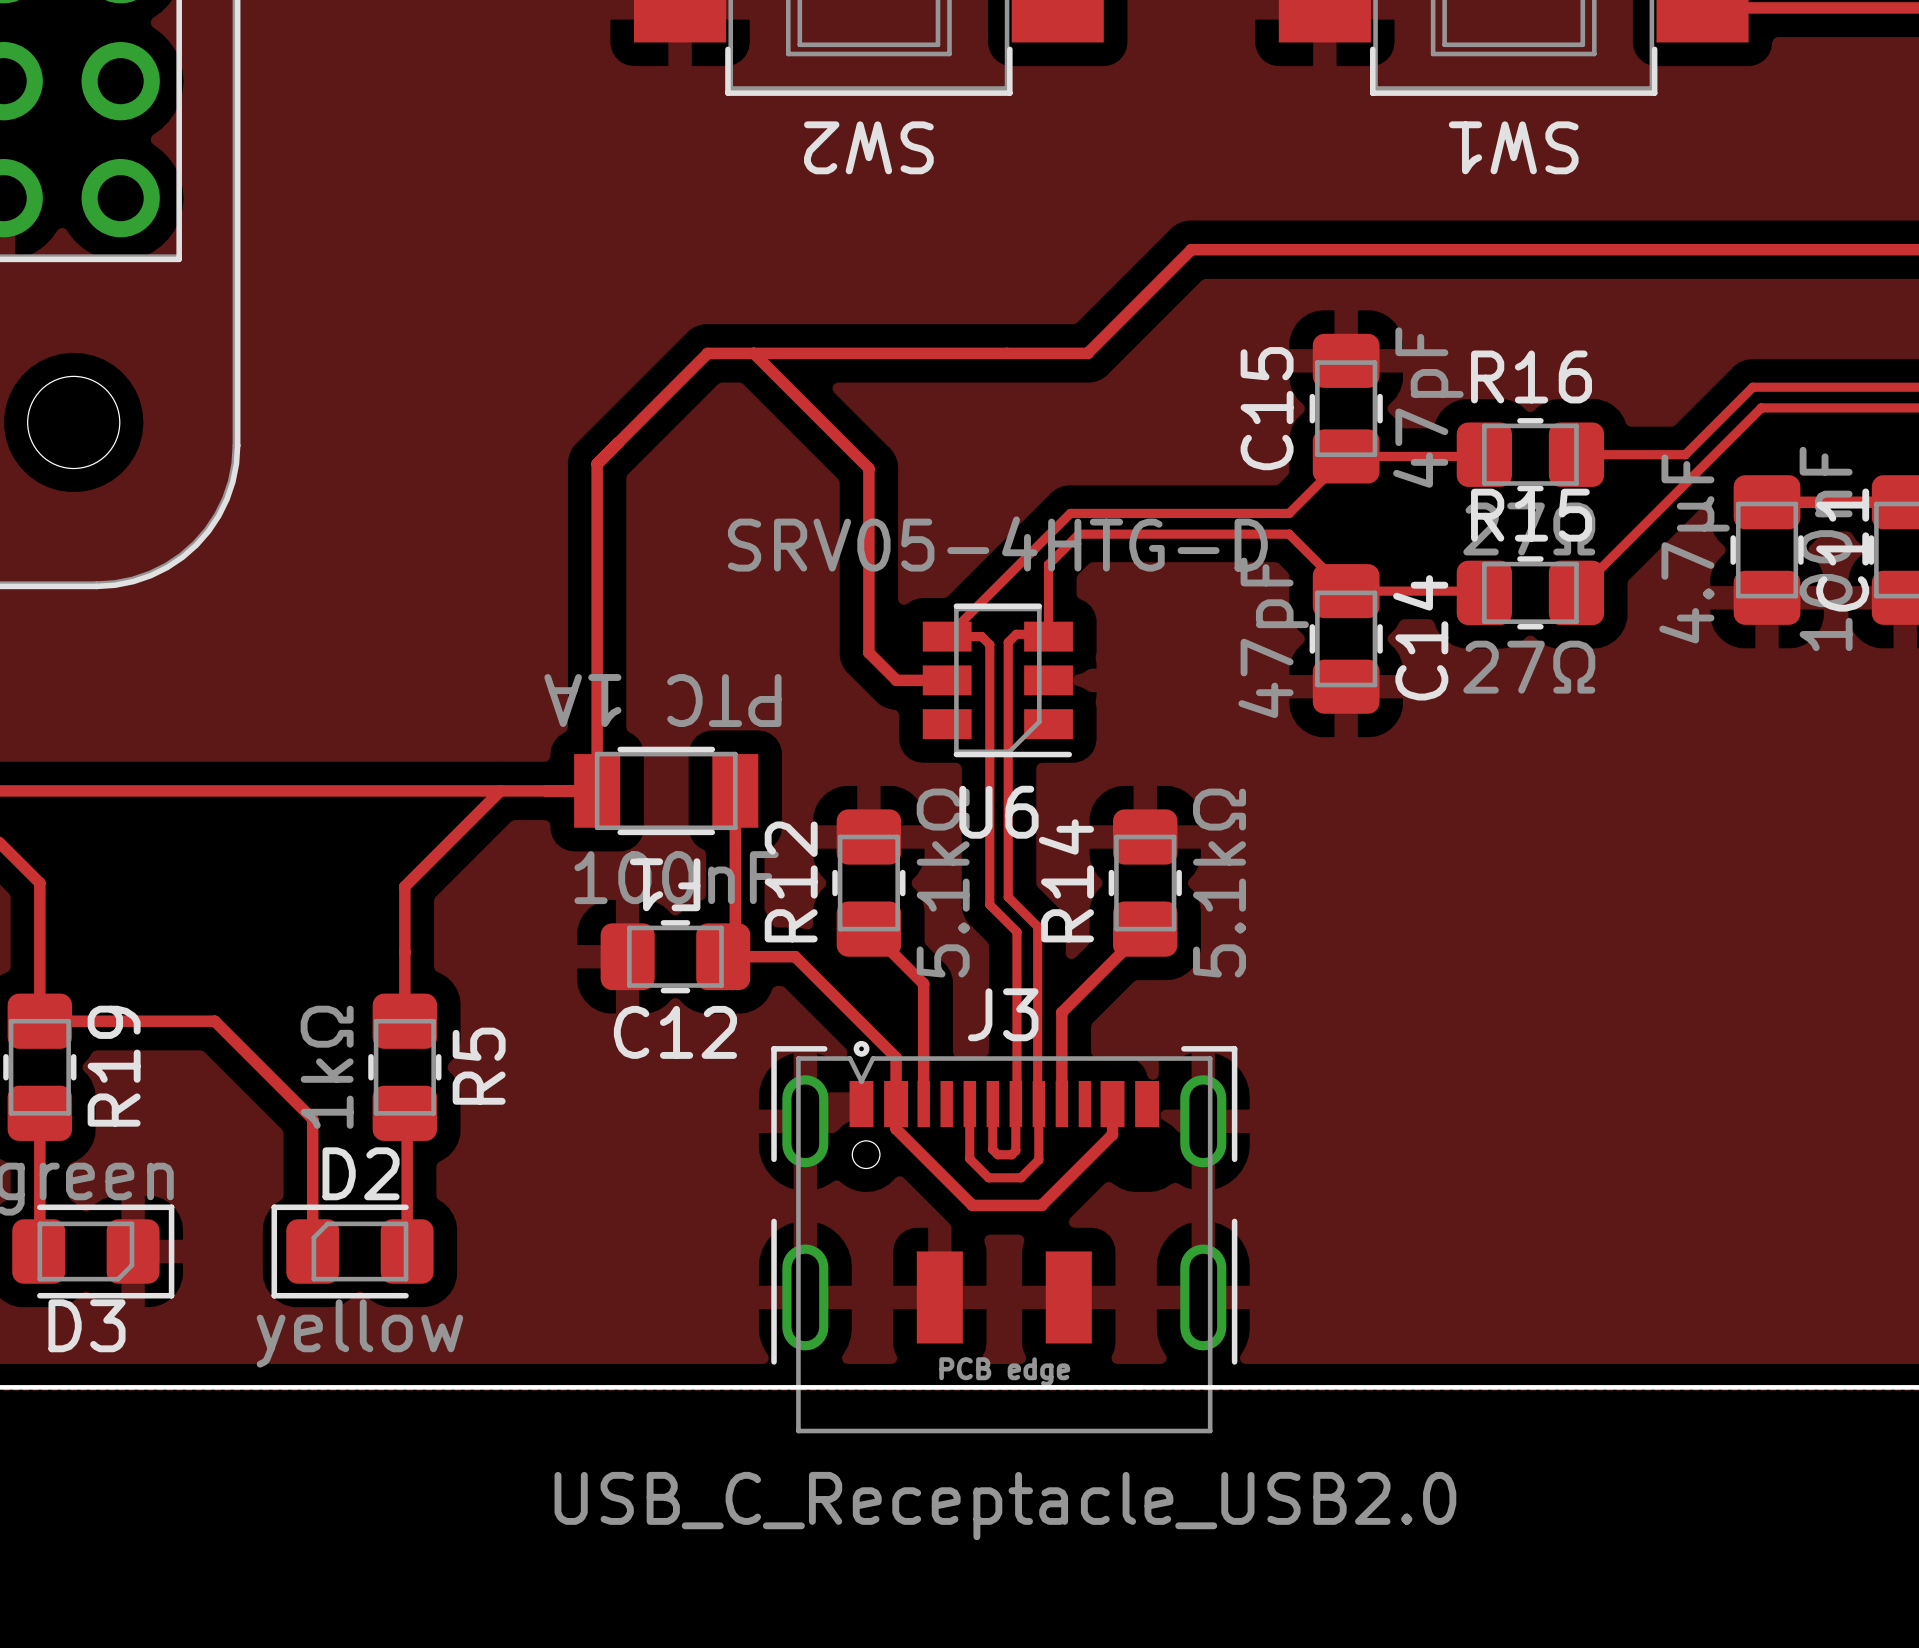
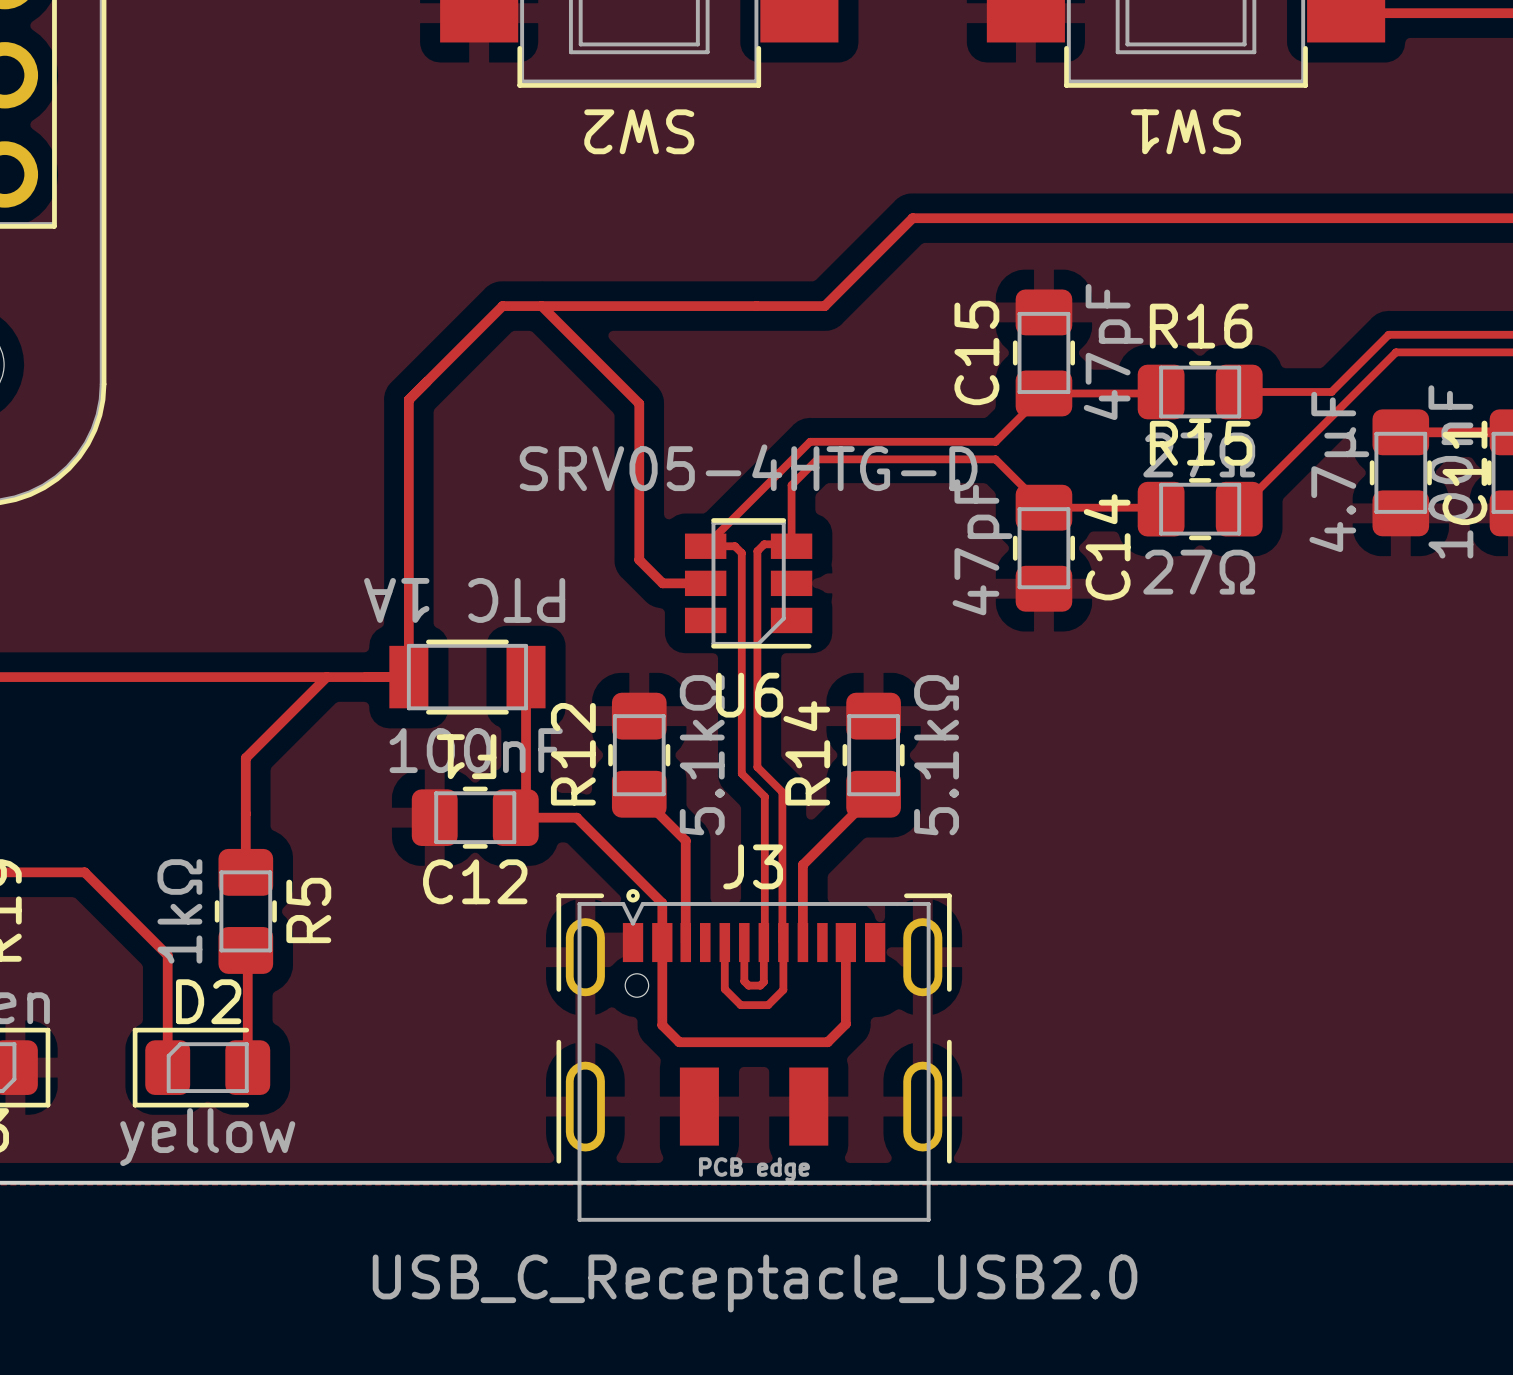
track: (896, 1128) (972, 1205) (1041, 1205) (1112, 1134) -> (662, 963) (662, 1025) (679, 1042) (827, 1042) (845, 1024) (845, 968)

